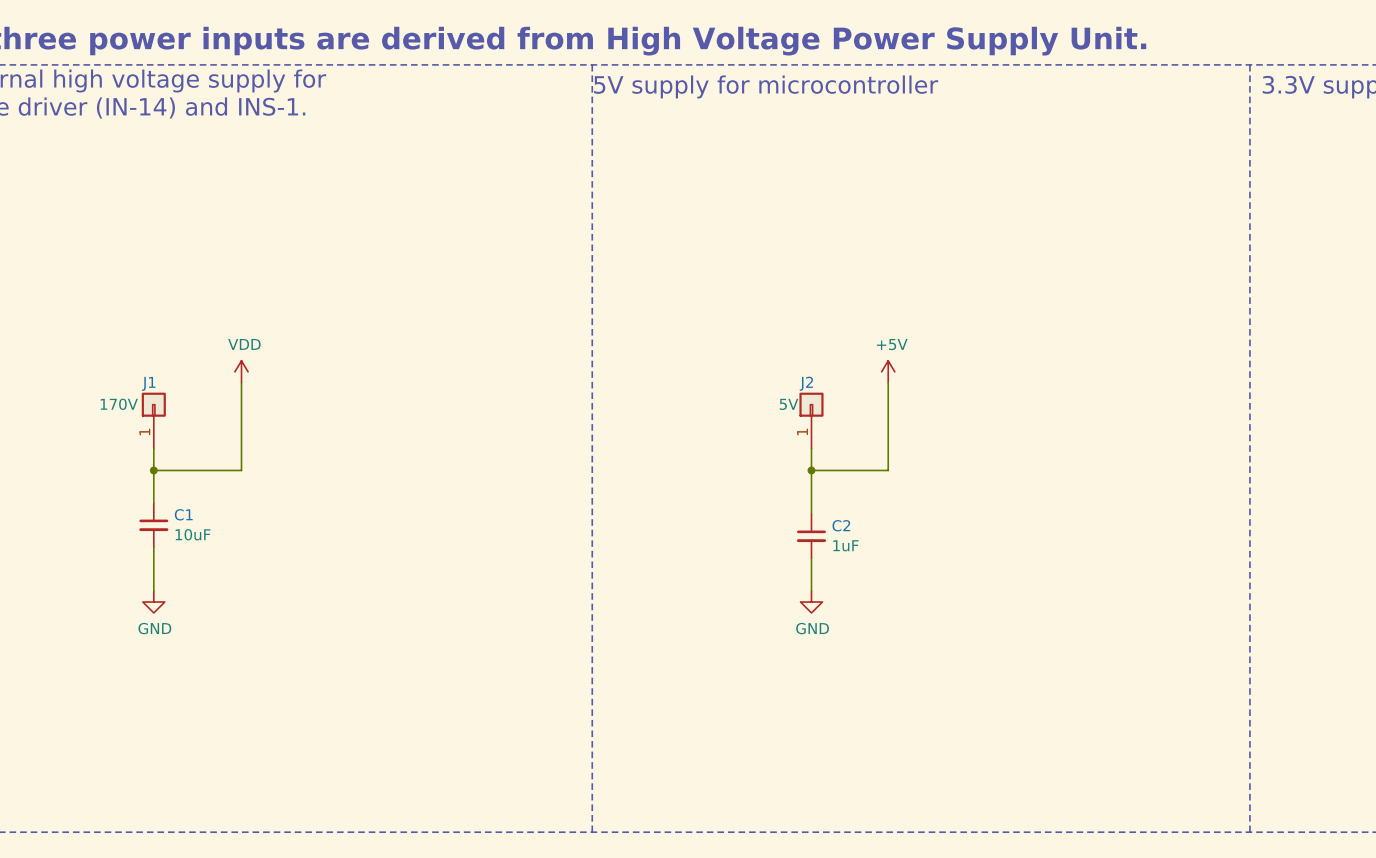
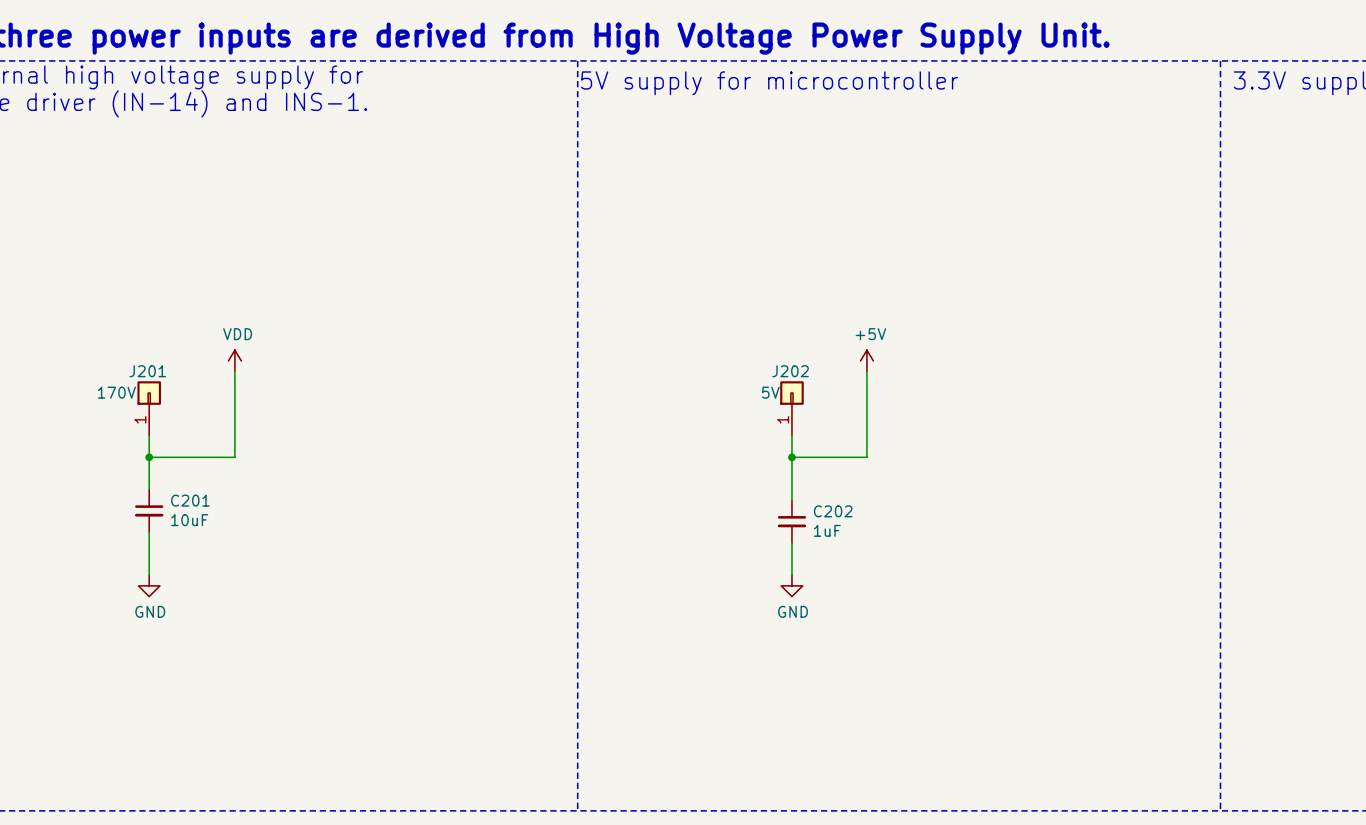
J1 name: J1 (148, 383) -> J201 (147, 371)
J2 name: J2 (806, 383) -> J202 (790, 371)
C1 name: C1 (183, 514) -> C201 (190, 500)
C2 name: C2 (841, 525) -> C202 (833, 511)

